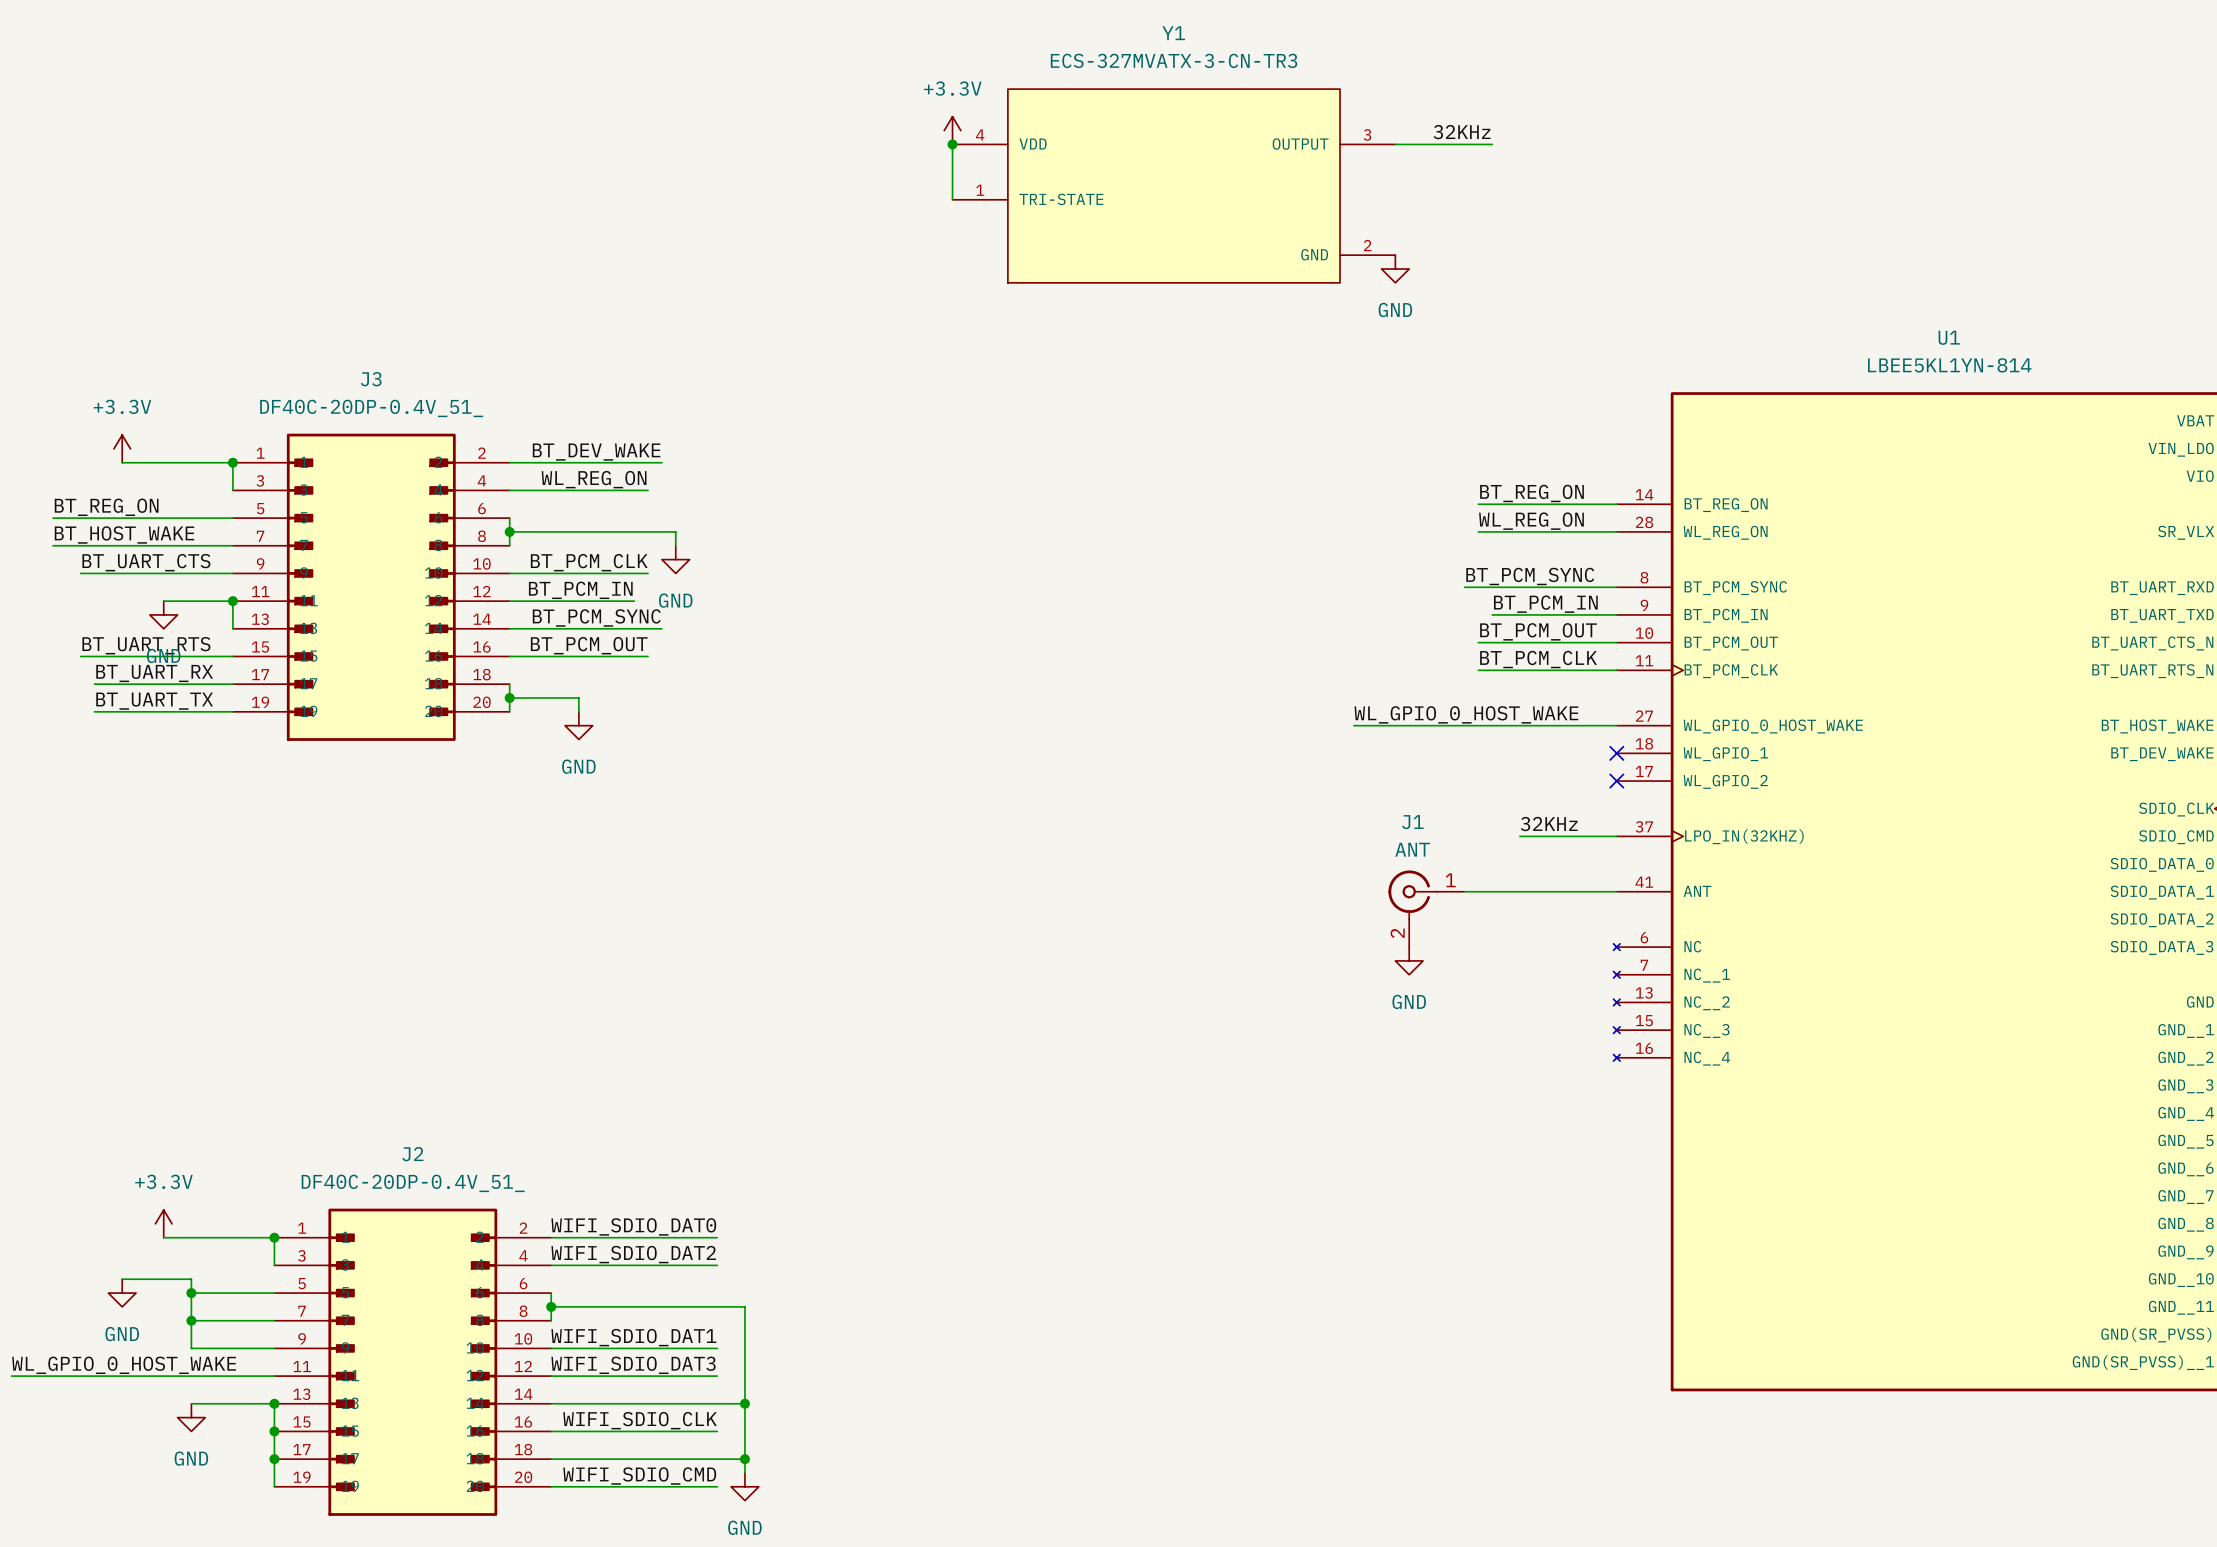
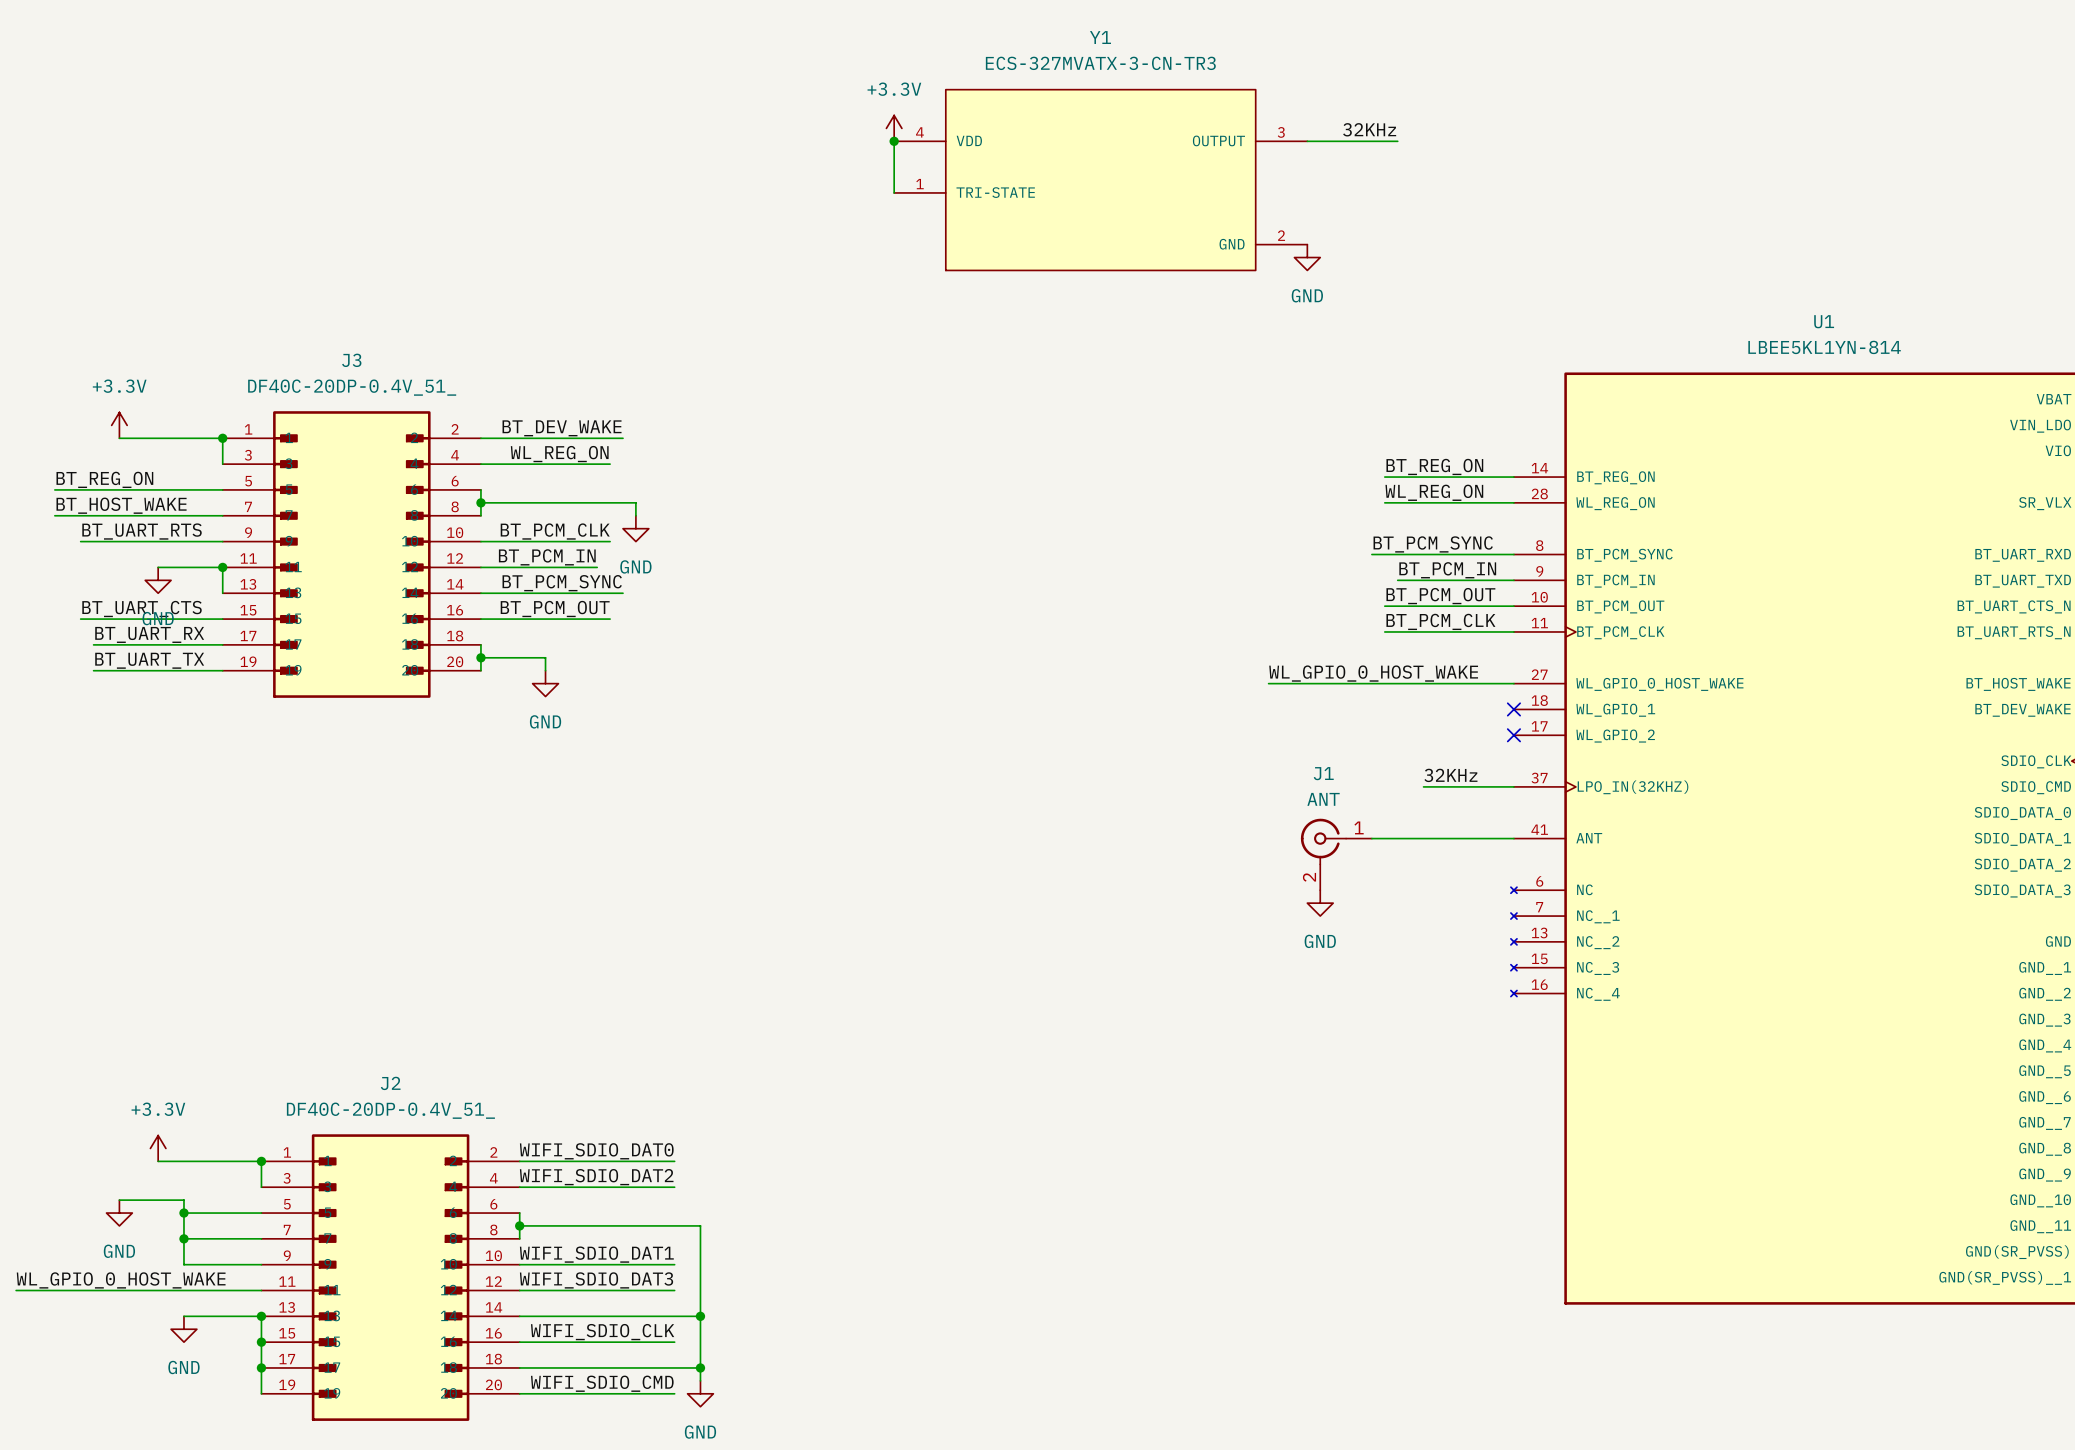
label: BT_UART_CTS (146, 562) -> BT_UART_RTS (142, 531)
label: BT_UART_RTS (146, 645) -> BT_UART_CTS (142, 609)

